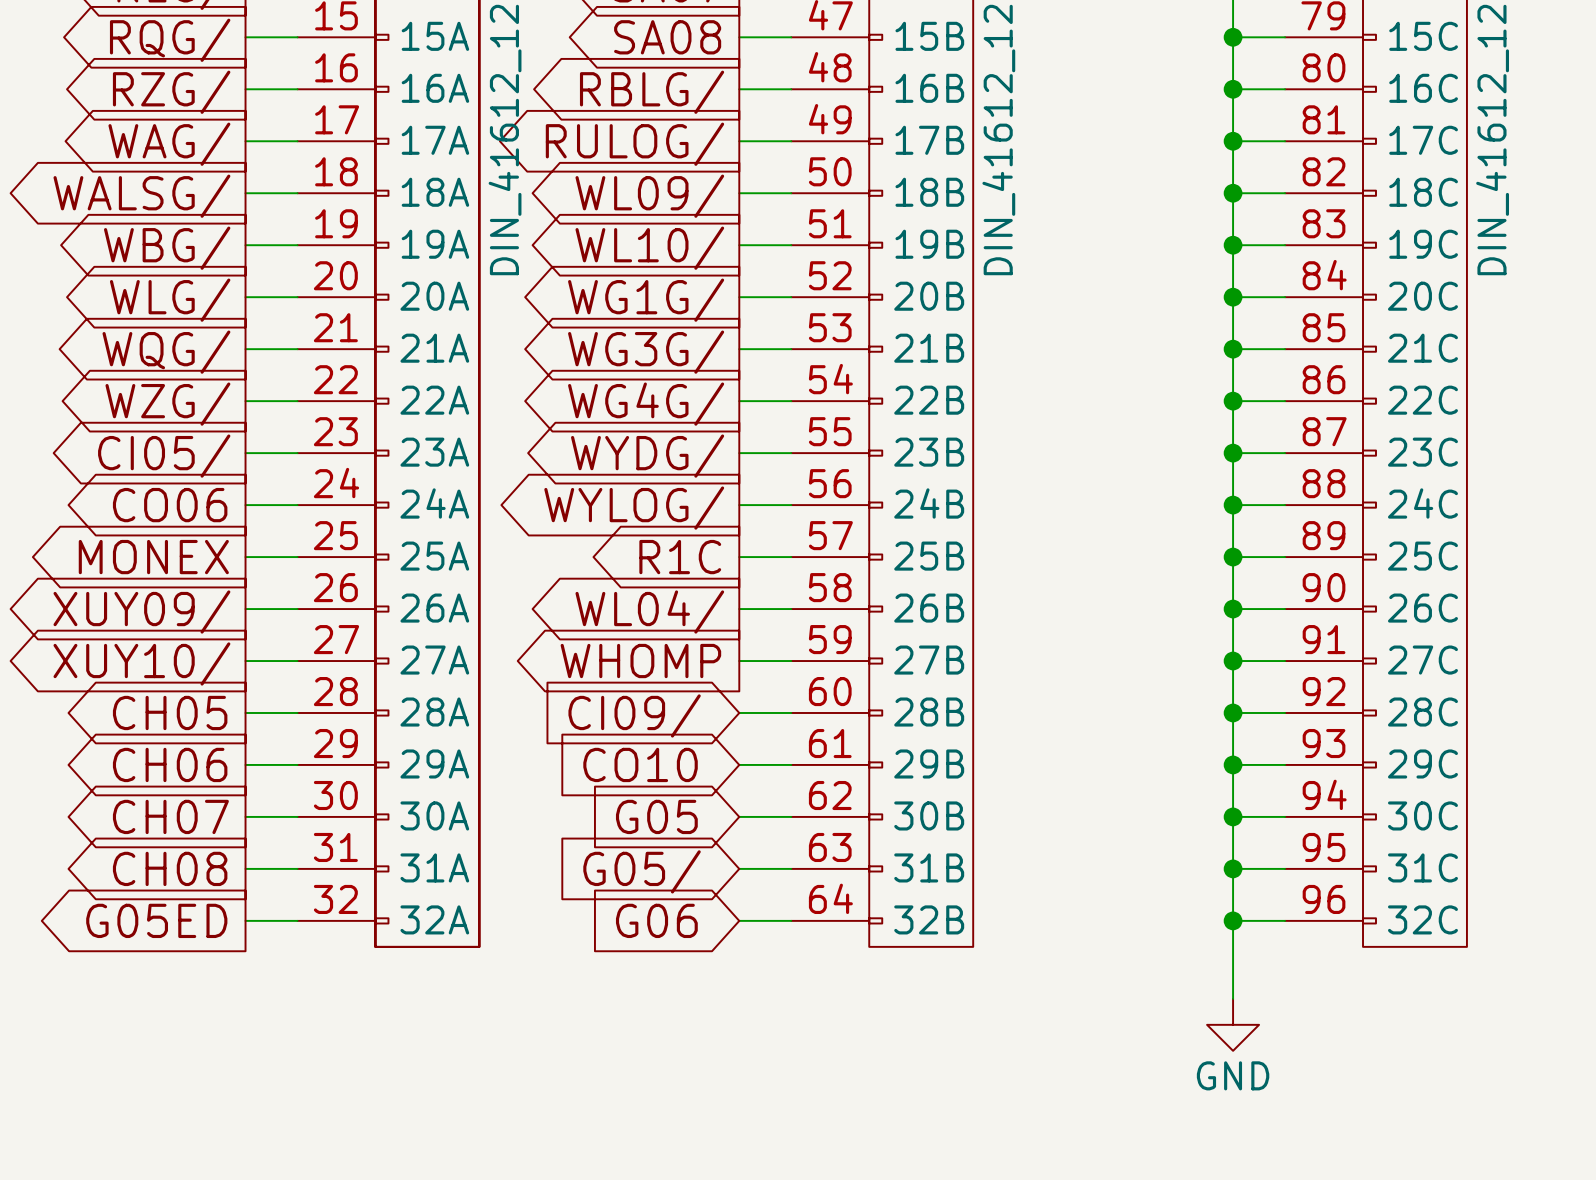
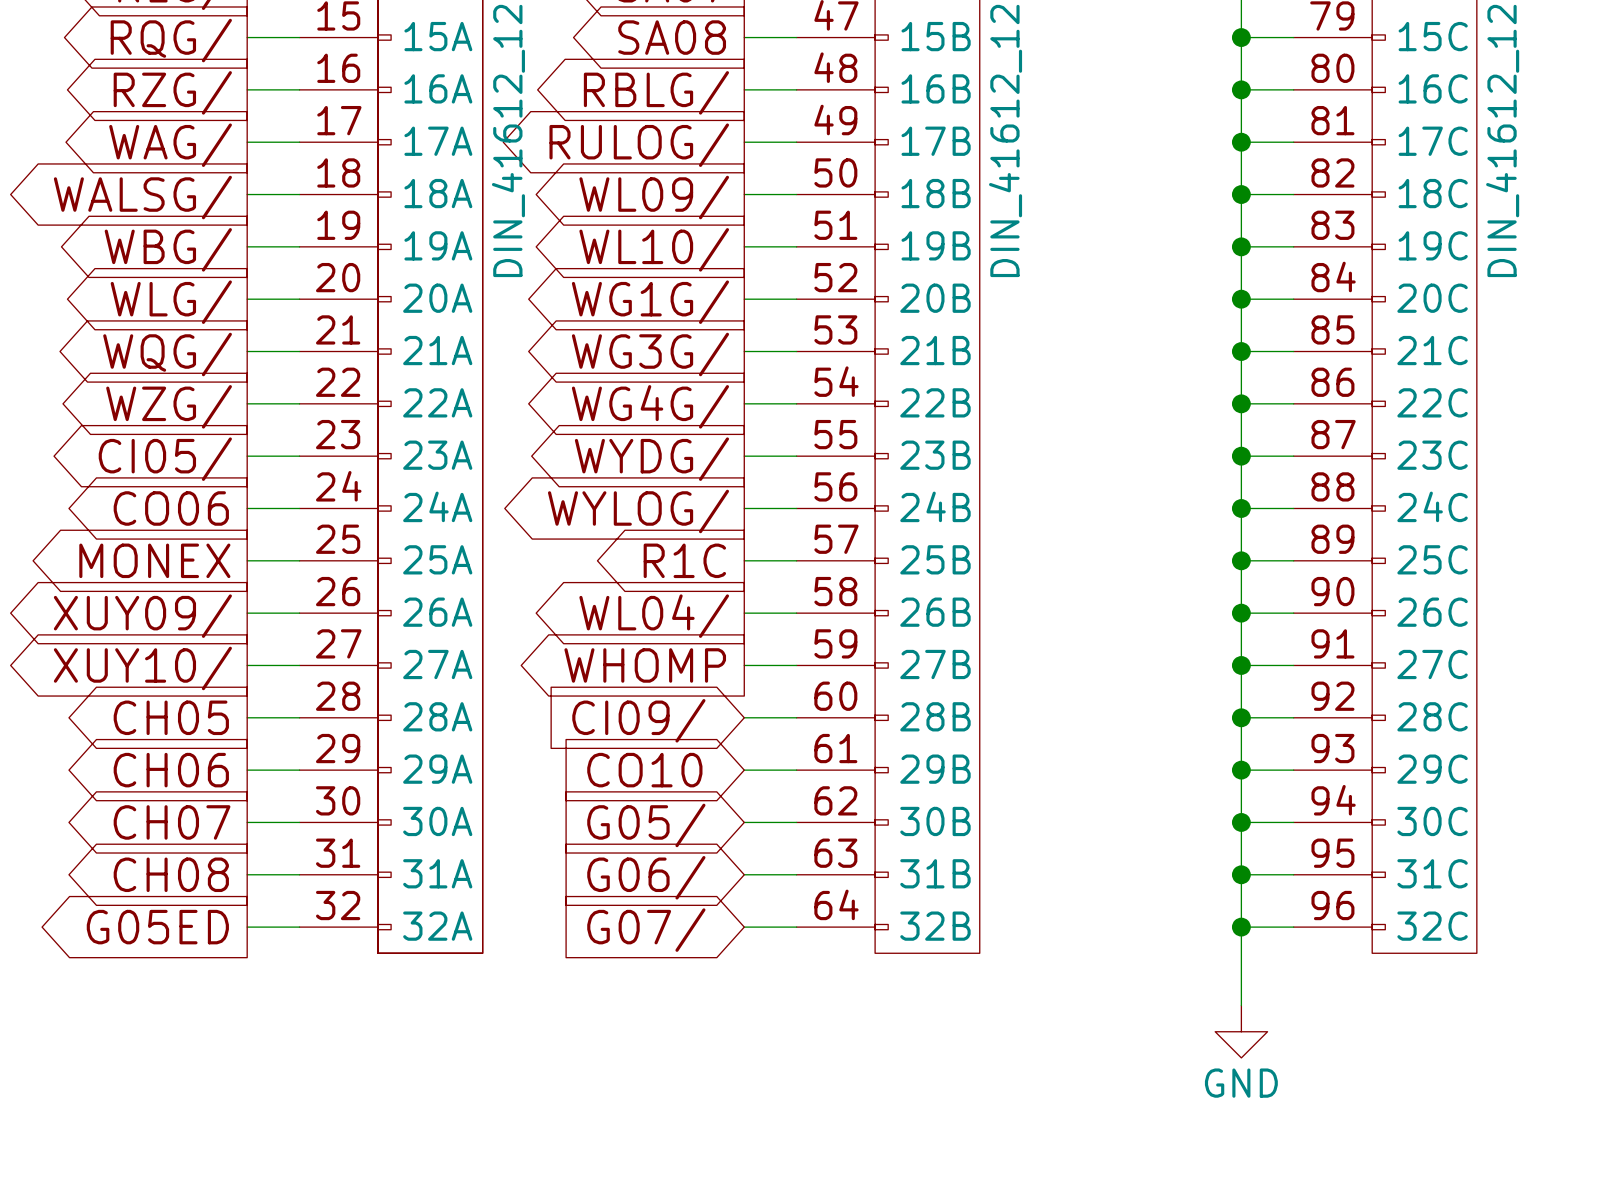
global label: G05 (656, 816) -> G05/ (646, 825)
global label: G05/ (642, 871) -> G06/ (646, 877)
global label: G06 (656, 920) -> G07/ (646, 930)

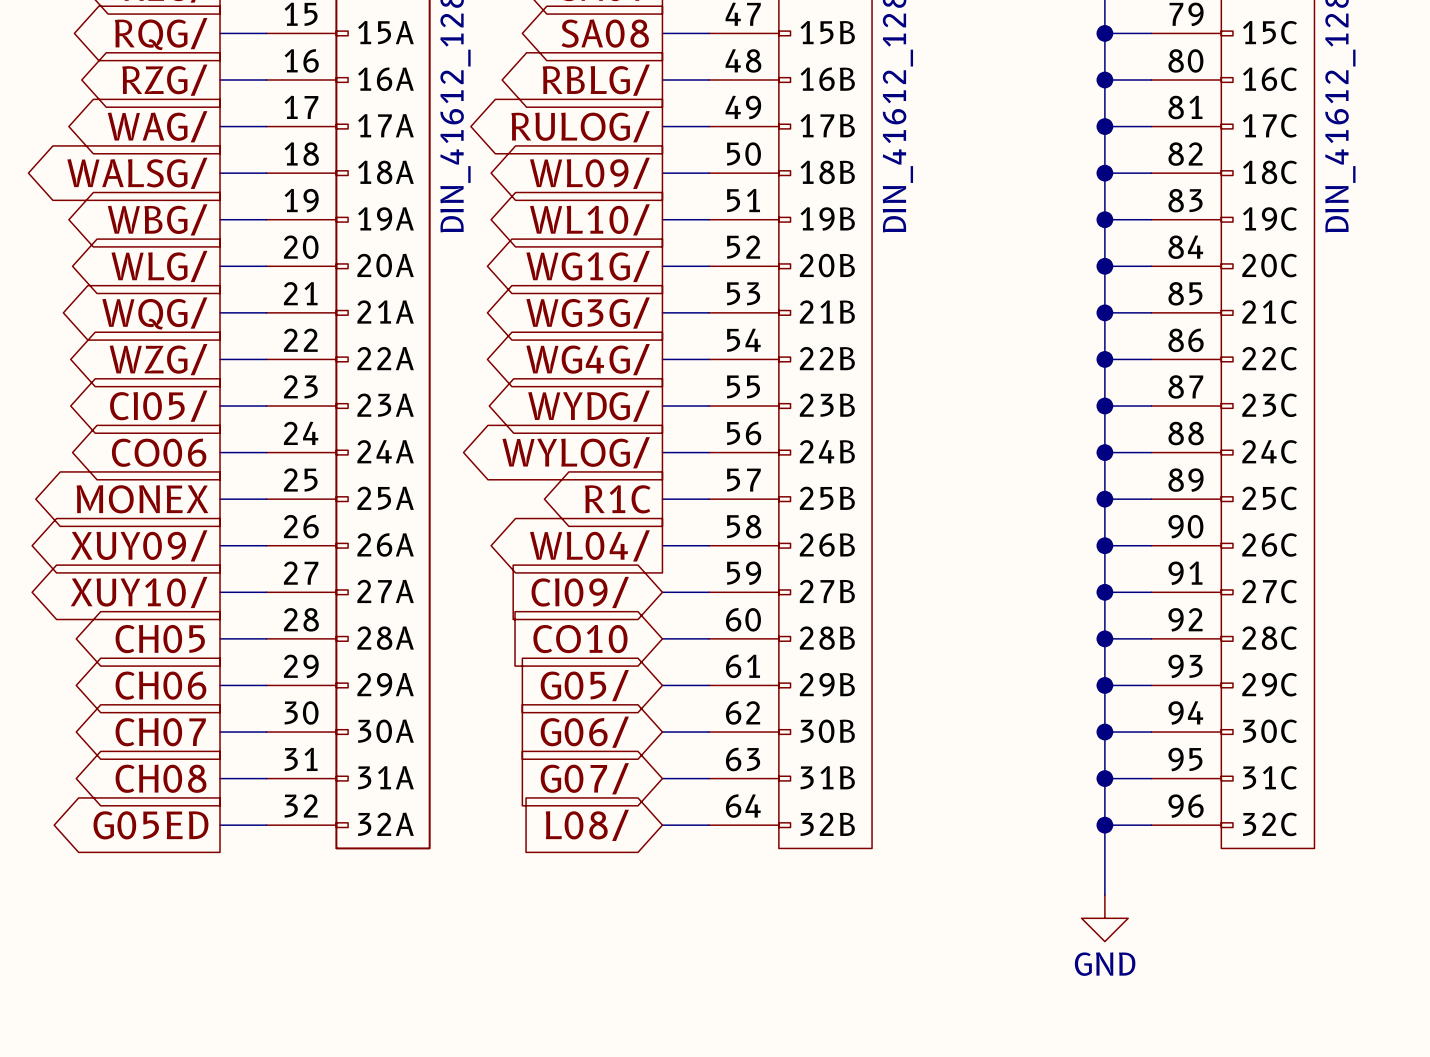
global label shape: output (645, 665) -> input (580, 592)
global label: WHOMP (645, 665) -> CI09/ (580, 592)
global label: CI09/ (638, 720) -> CO10 (580, 639)
global label: CO10 (644, 770) -> G05/ (584, 685)
global label: G05/ (646, 825) -> G06/ (584, 732)
global label: G06/ (646, 877) -> G07/ (584, 778)
global label: G07/ (646, 930) -> L08/ (587, 825)

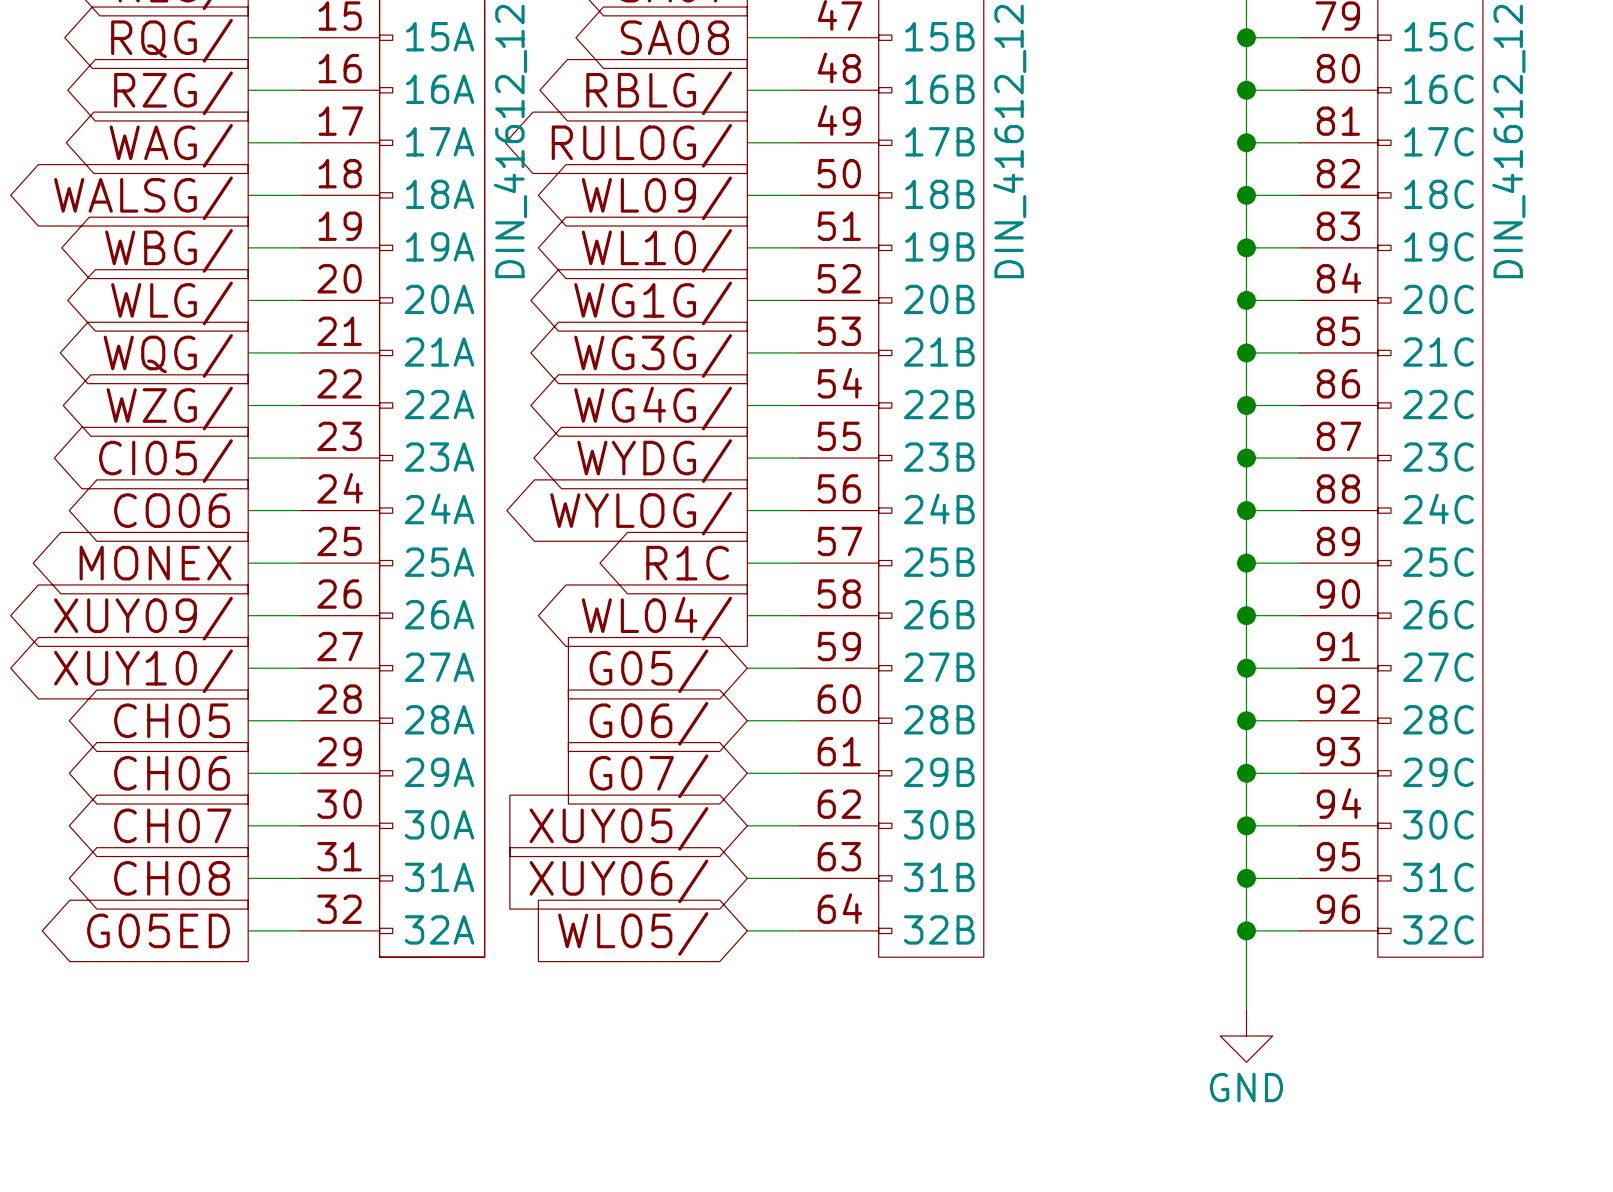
global label: CI09/ (580, 592) -> G05/ (649, 671)
global label: CO10 (580, 639) -> G06/ (649, 723)
global label: G05/ (584, 685) -> G07/ (649, 776)
global label: G06/ (584, 732) -> XUY05/ (618, 828)
global label: G07/ (584, 778) -> XUY06/ (618, 881)
global label: L08/ (587, 825) -> WL05/ (633, 933)

